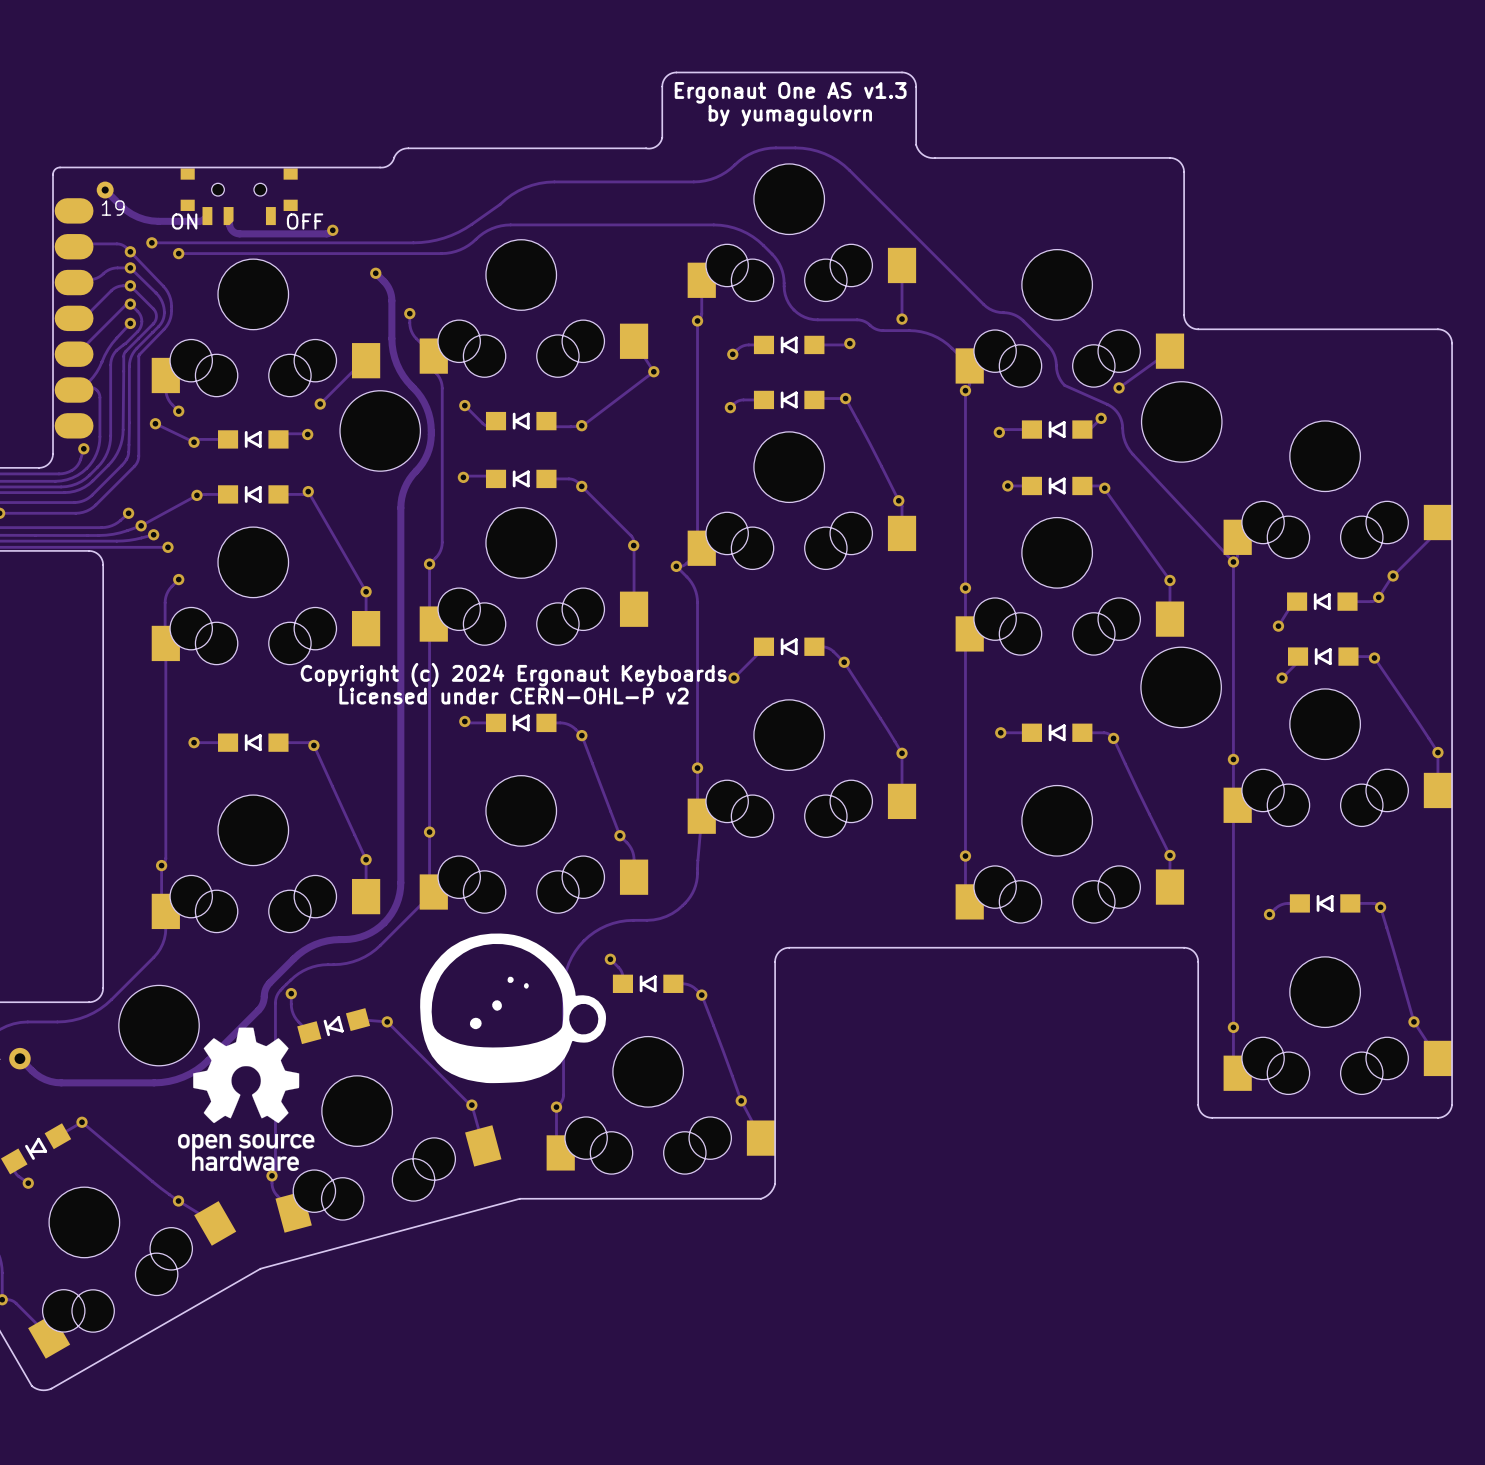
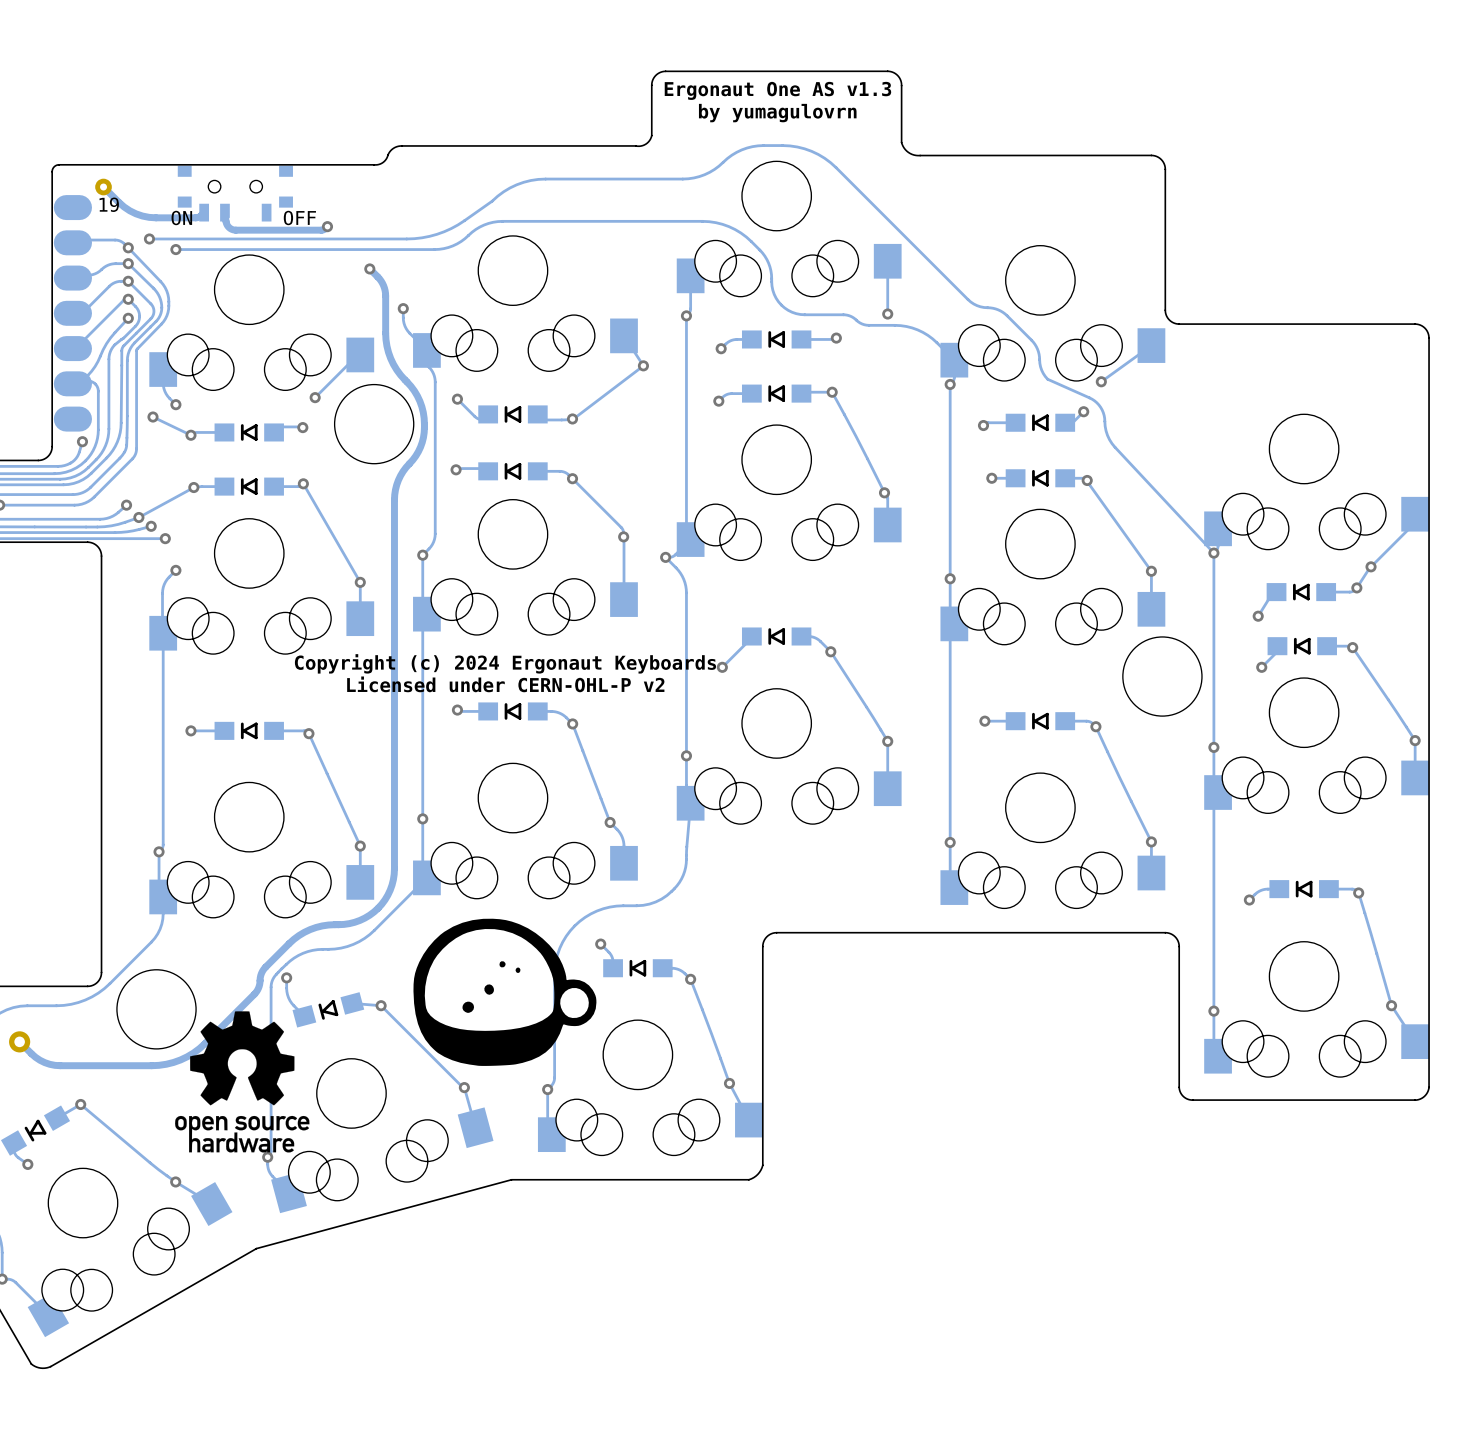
part: (1181, 421) -> none

